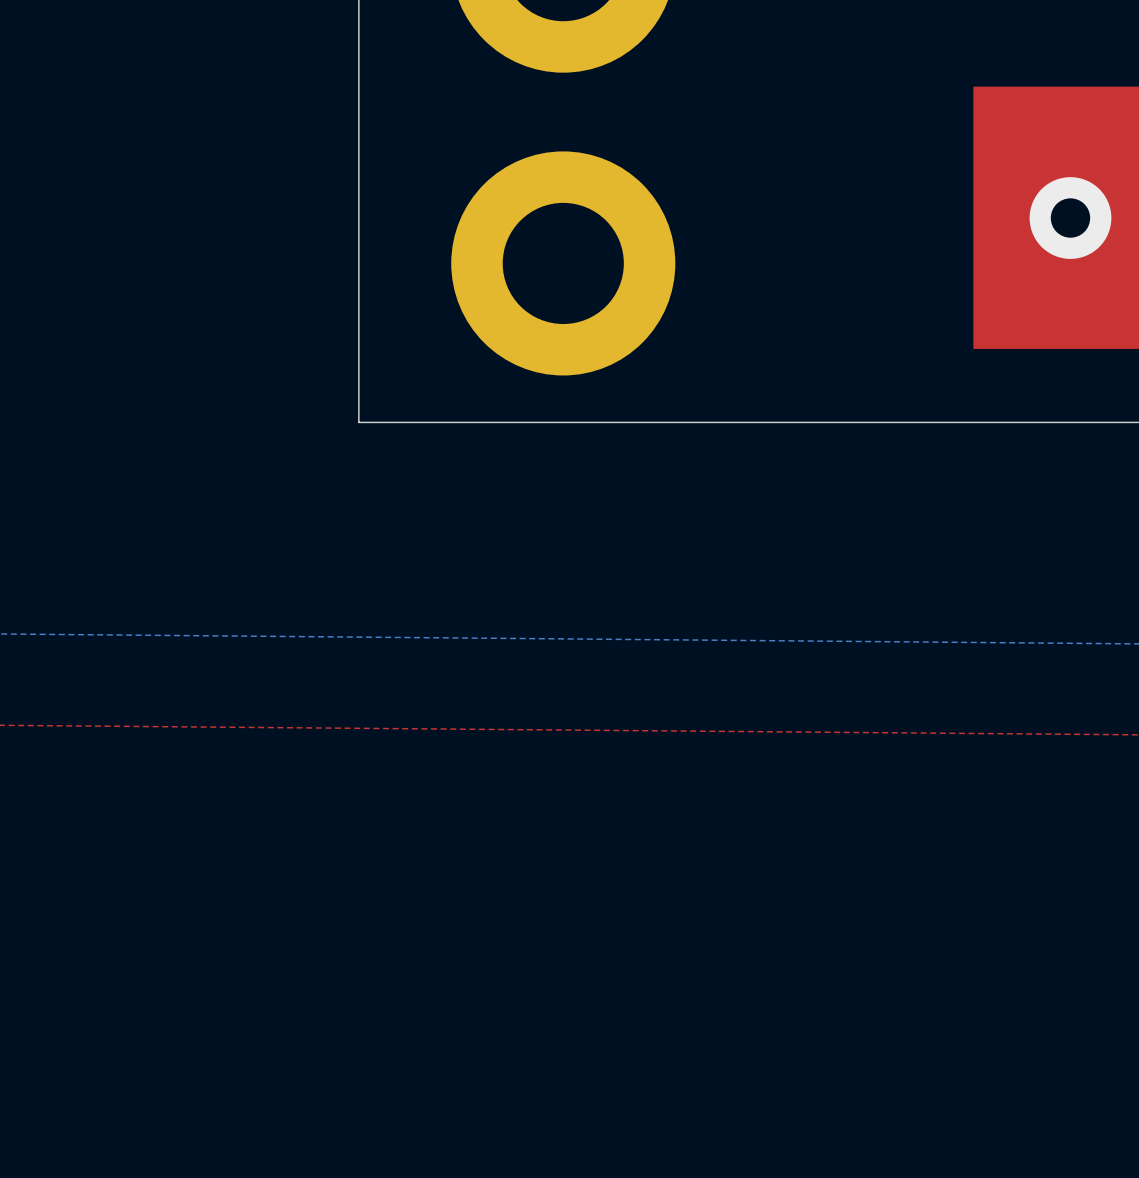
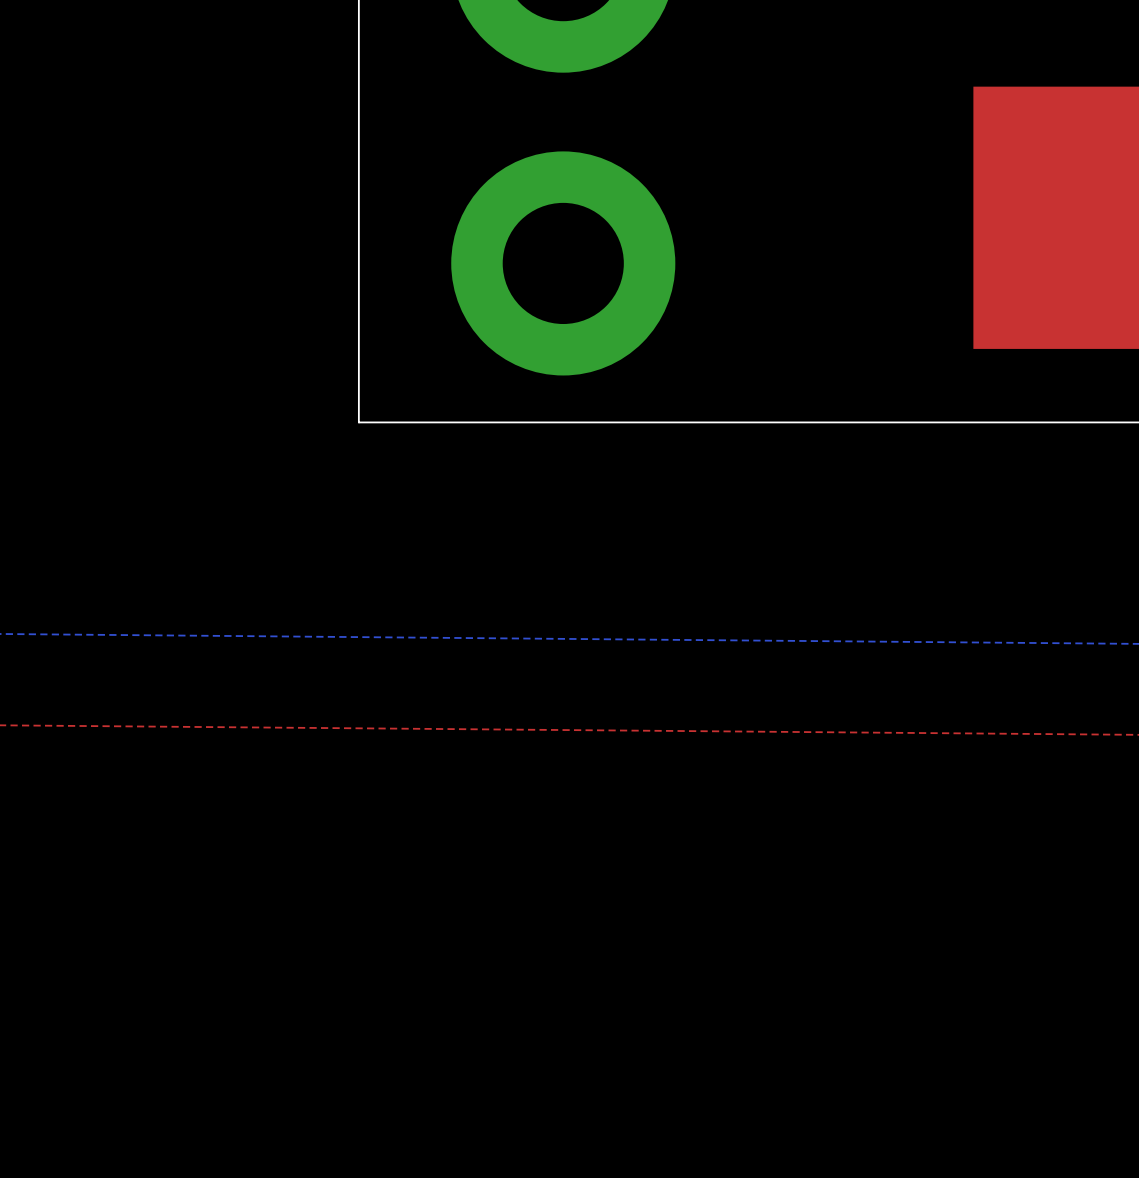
via: (1070, 218) -> none

